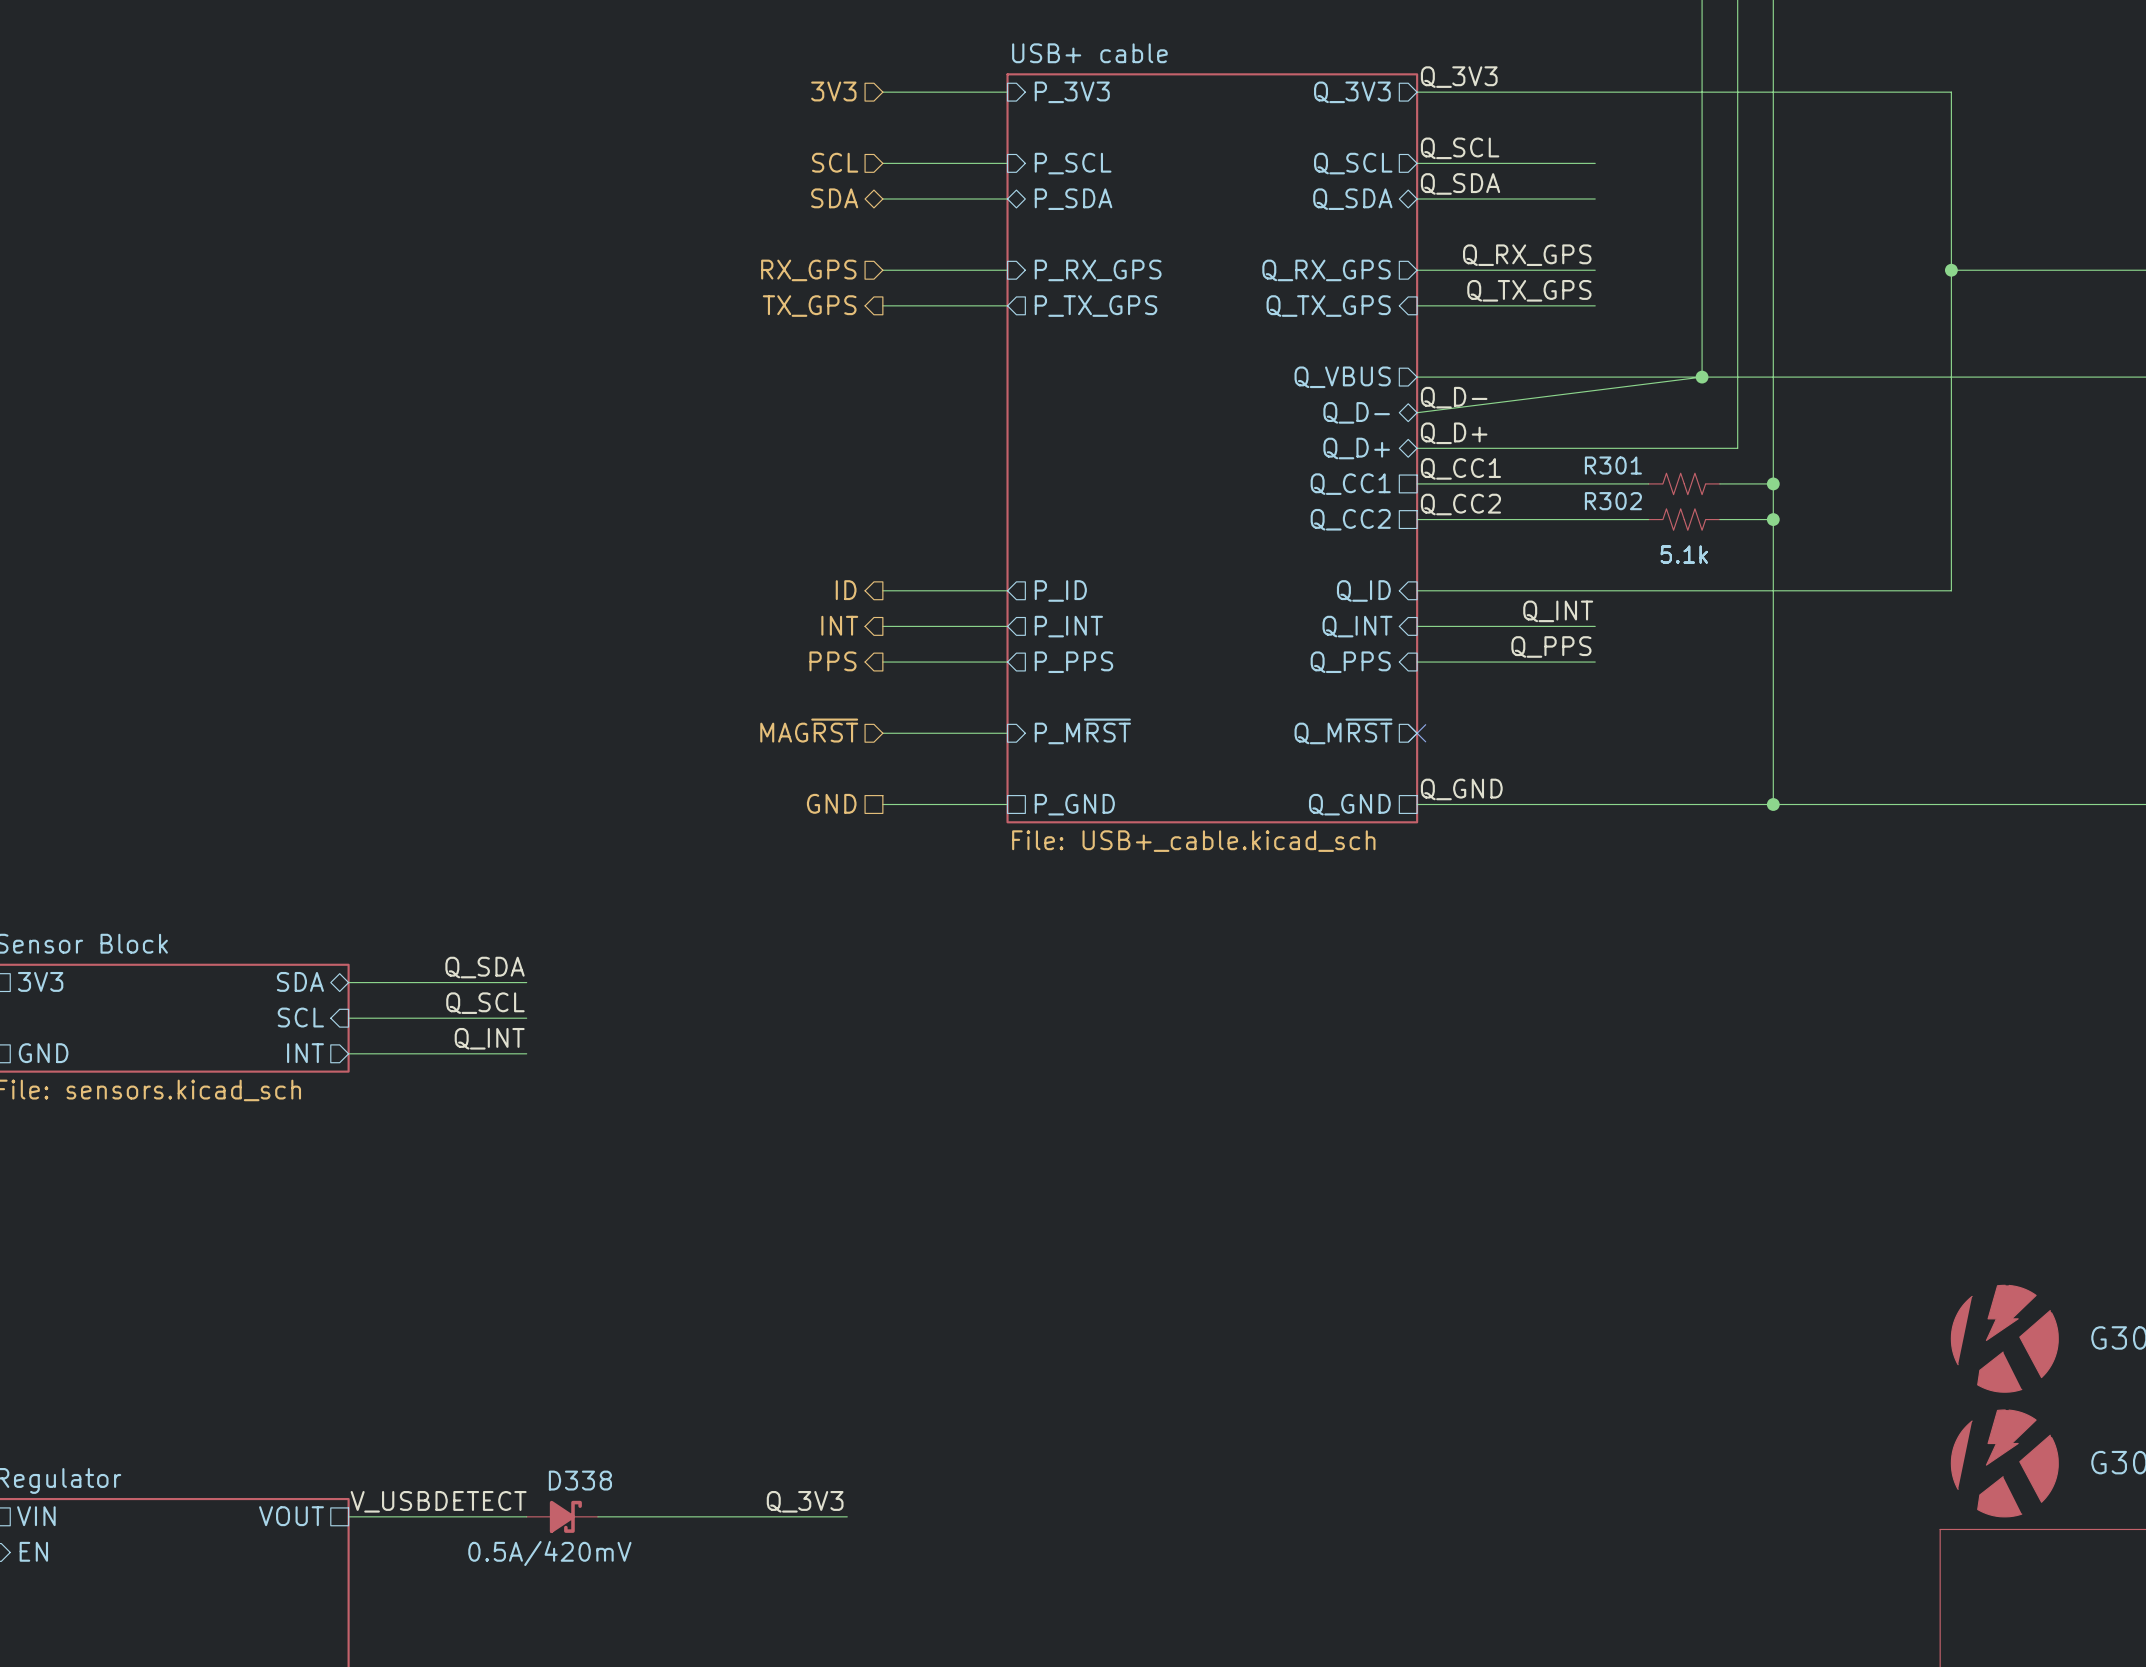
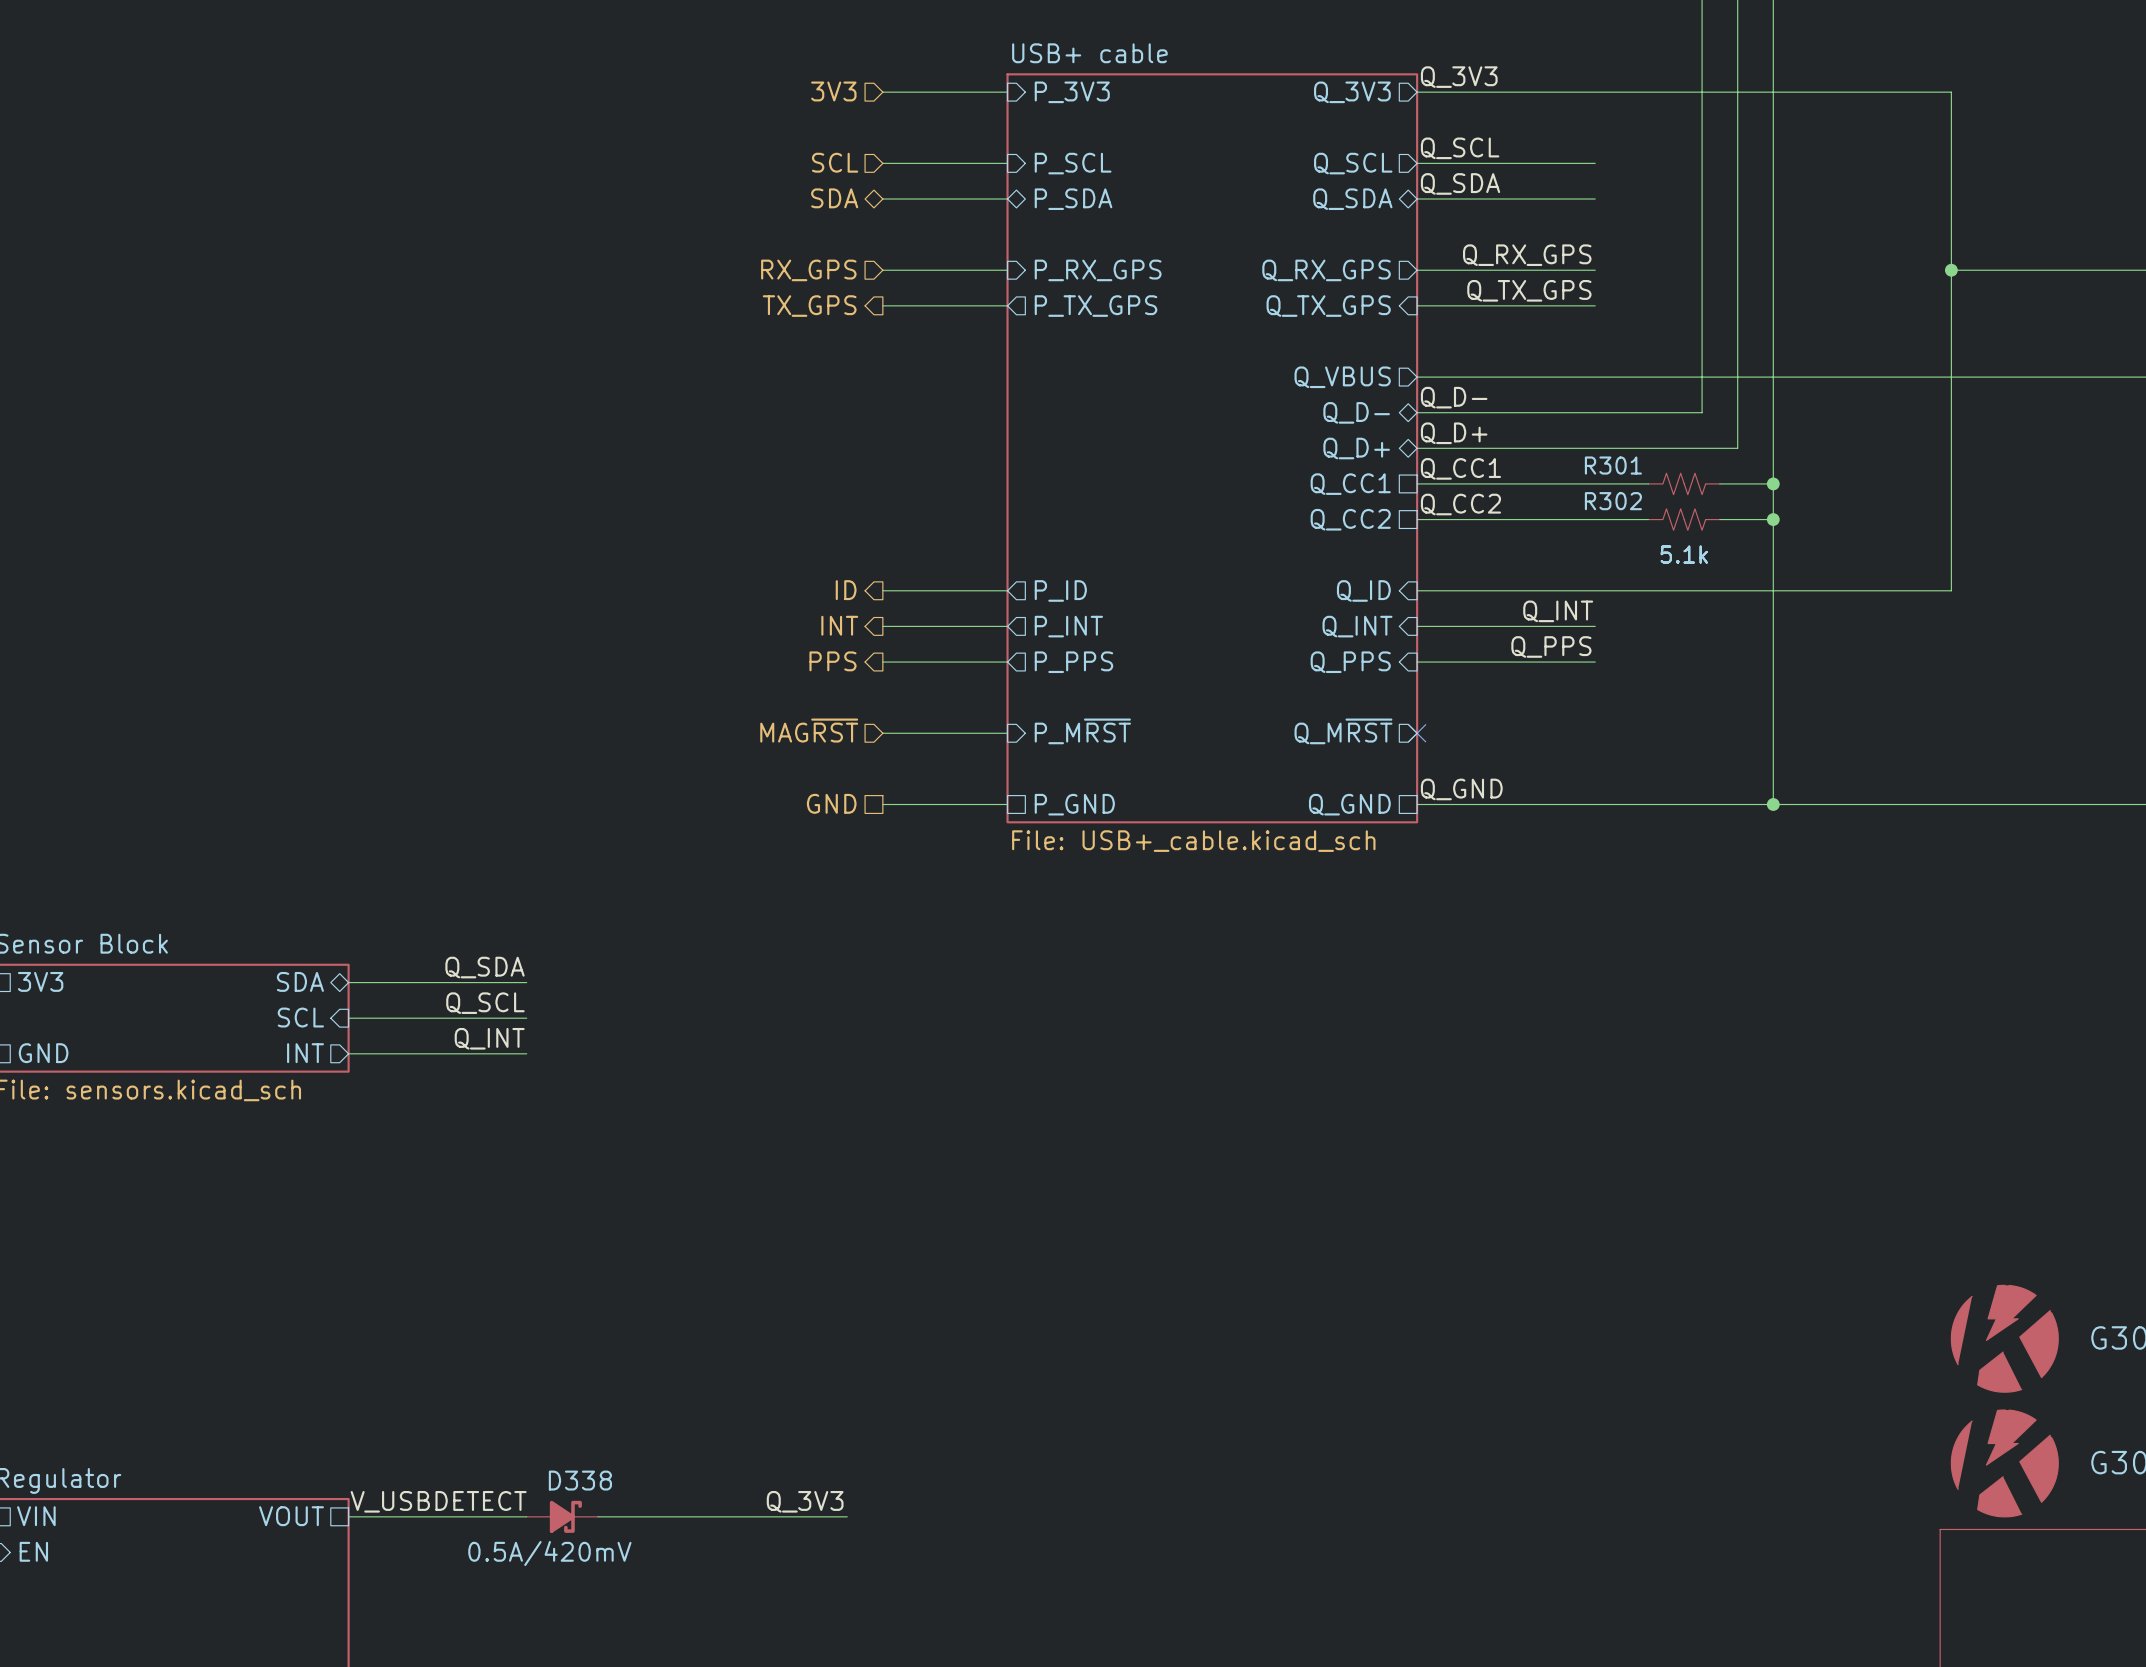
wire: (1702, 377) (1417, 412) -> (1702, 377) (1702, 412) (1417, 412)
junction: (1702, 377) -> none

